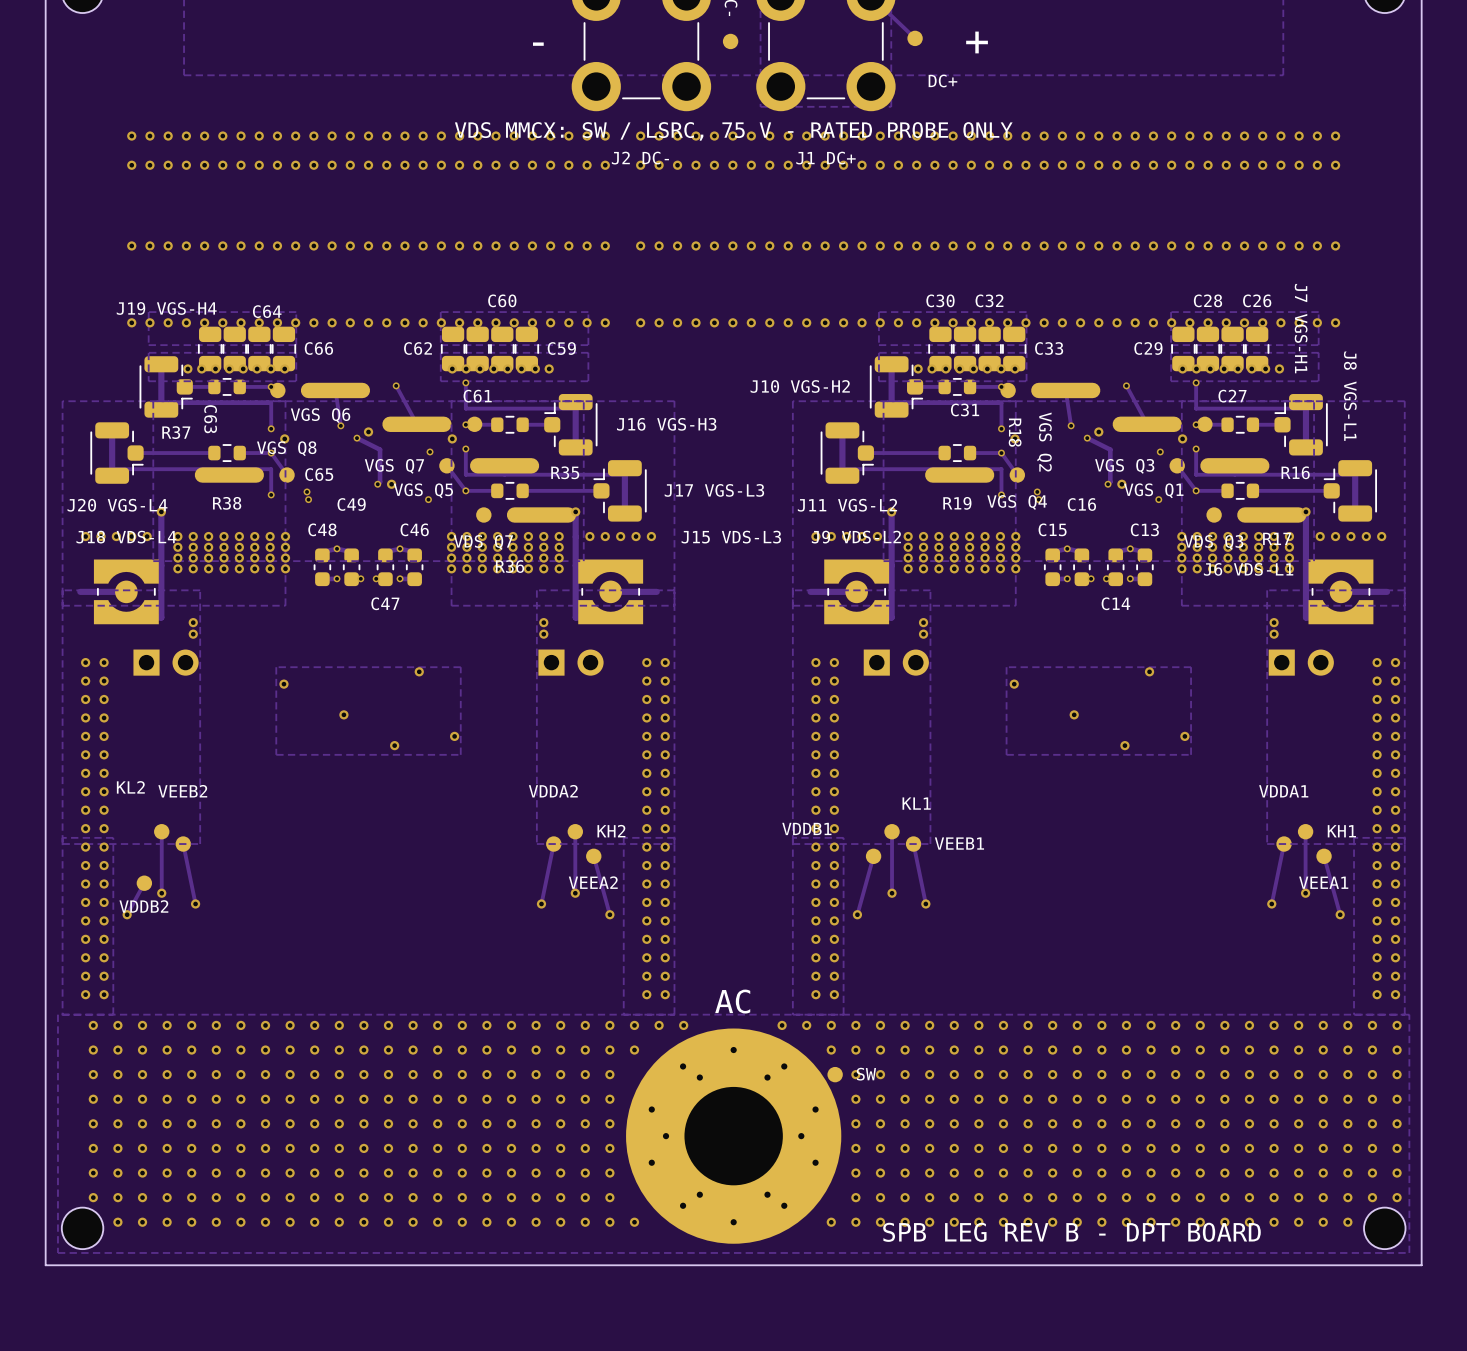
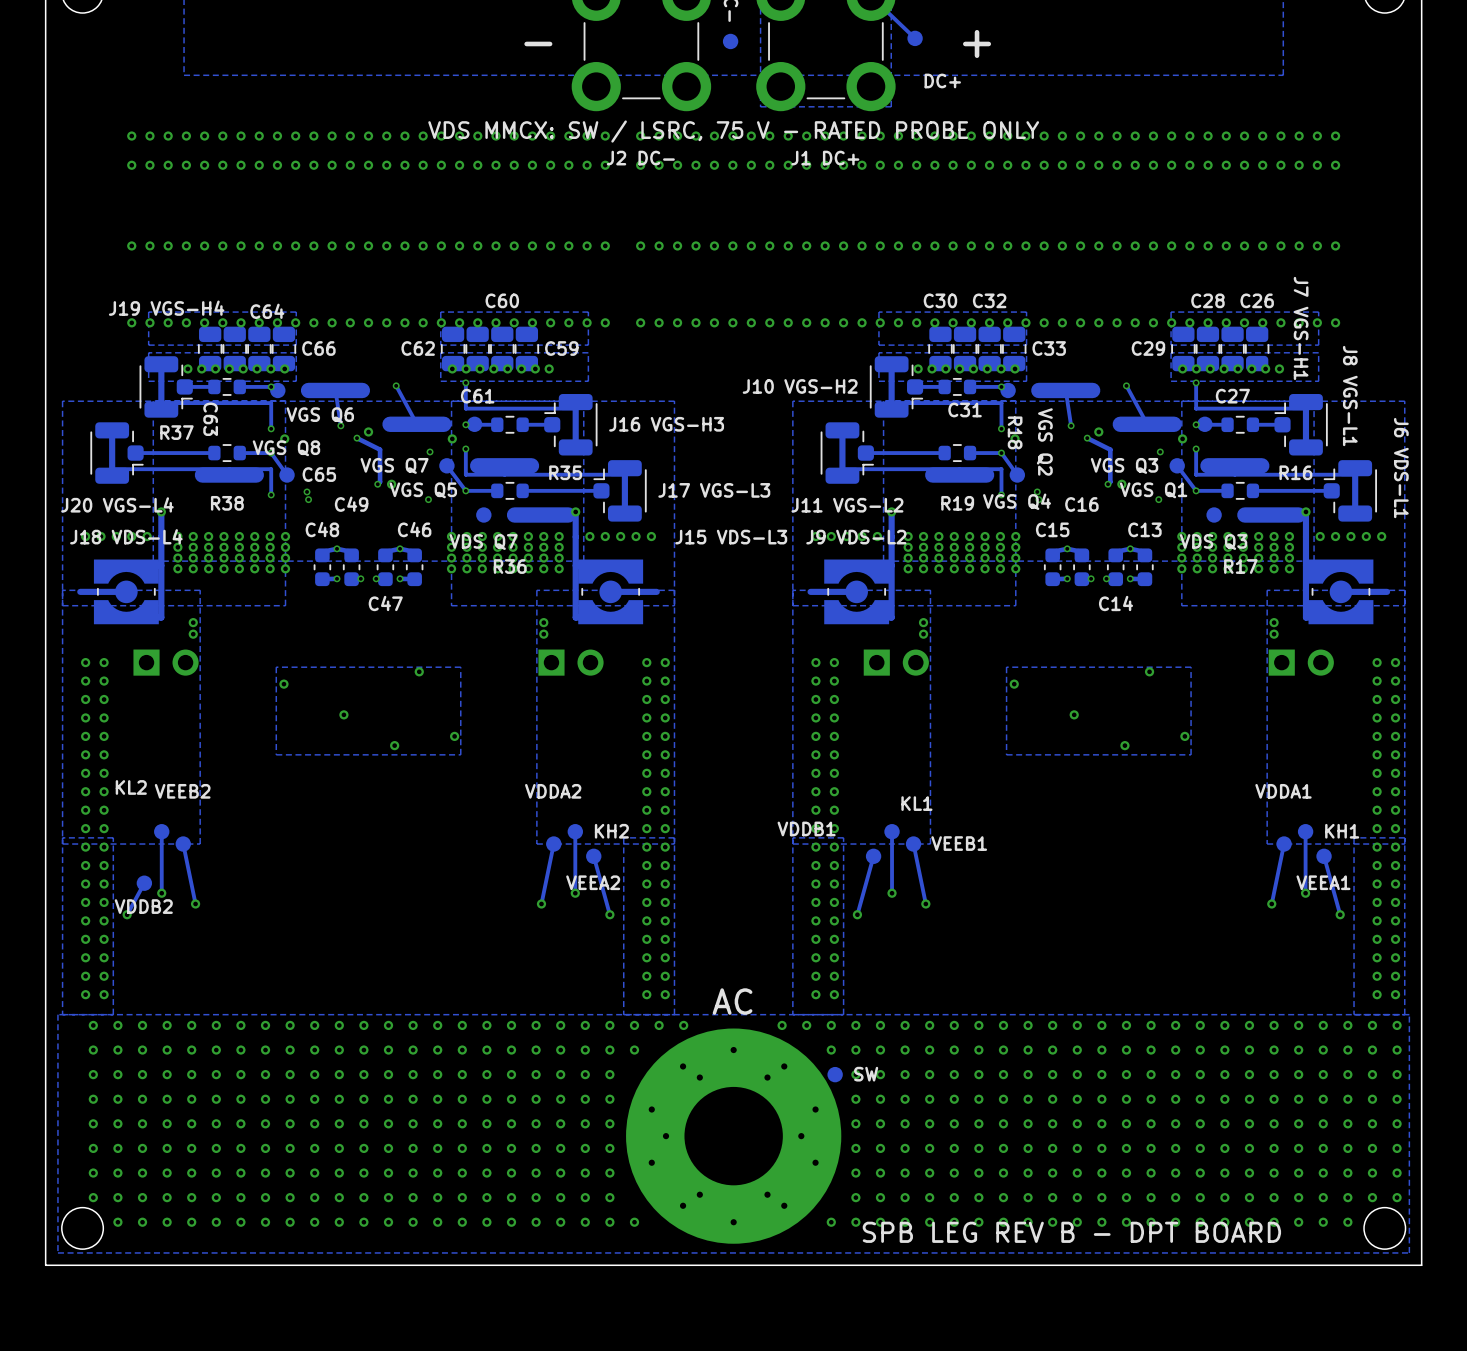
text: none -> J6 VDS-L1 (1401, 468)
text: R17 (1277, 538) -> none
text: J6 VDS-L1 (1248, 569) -> R17 (1240, 566)

